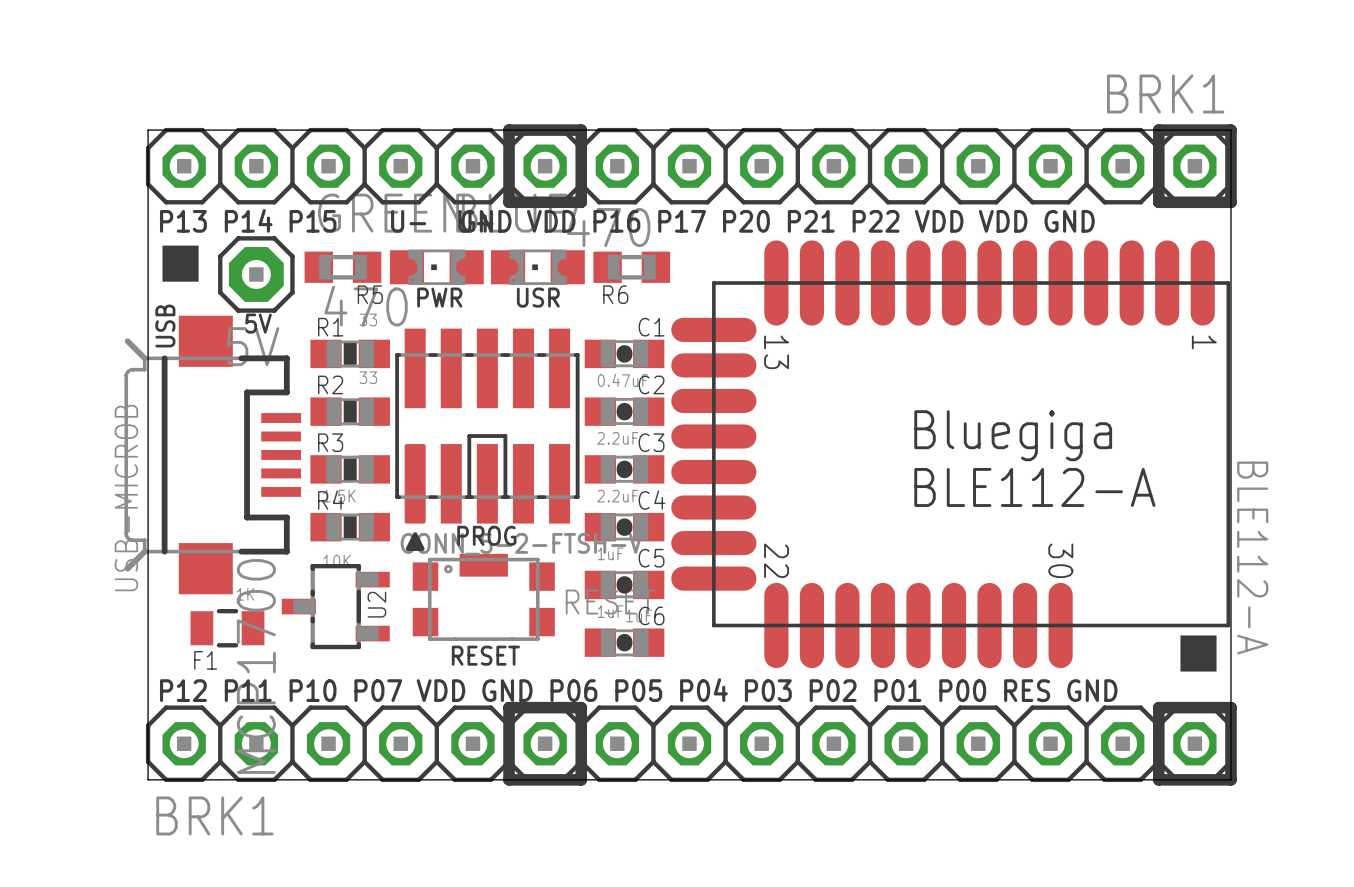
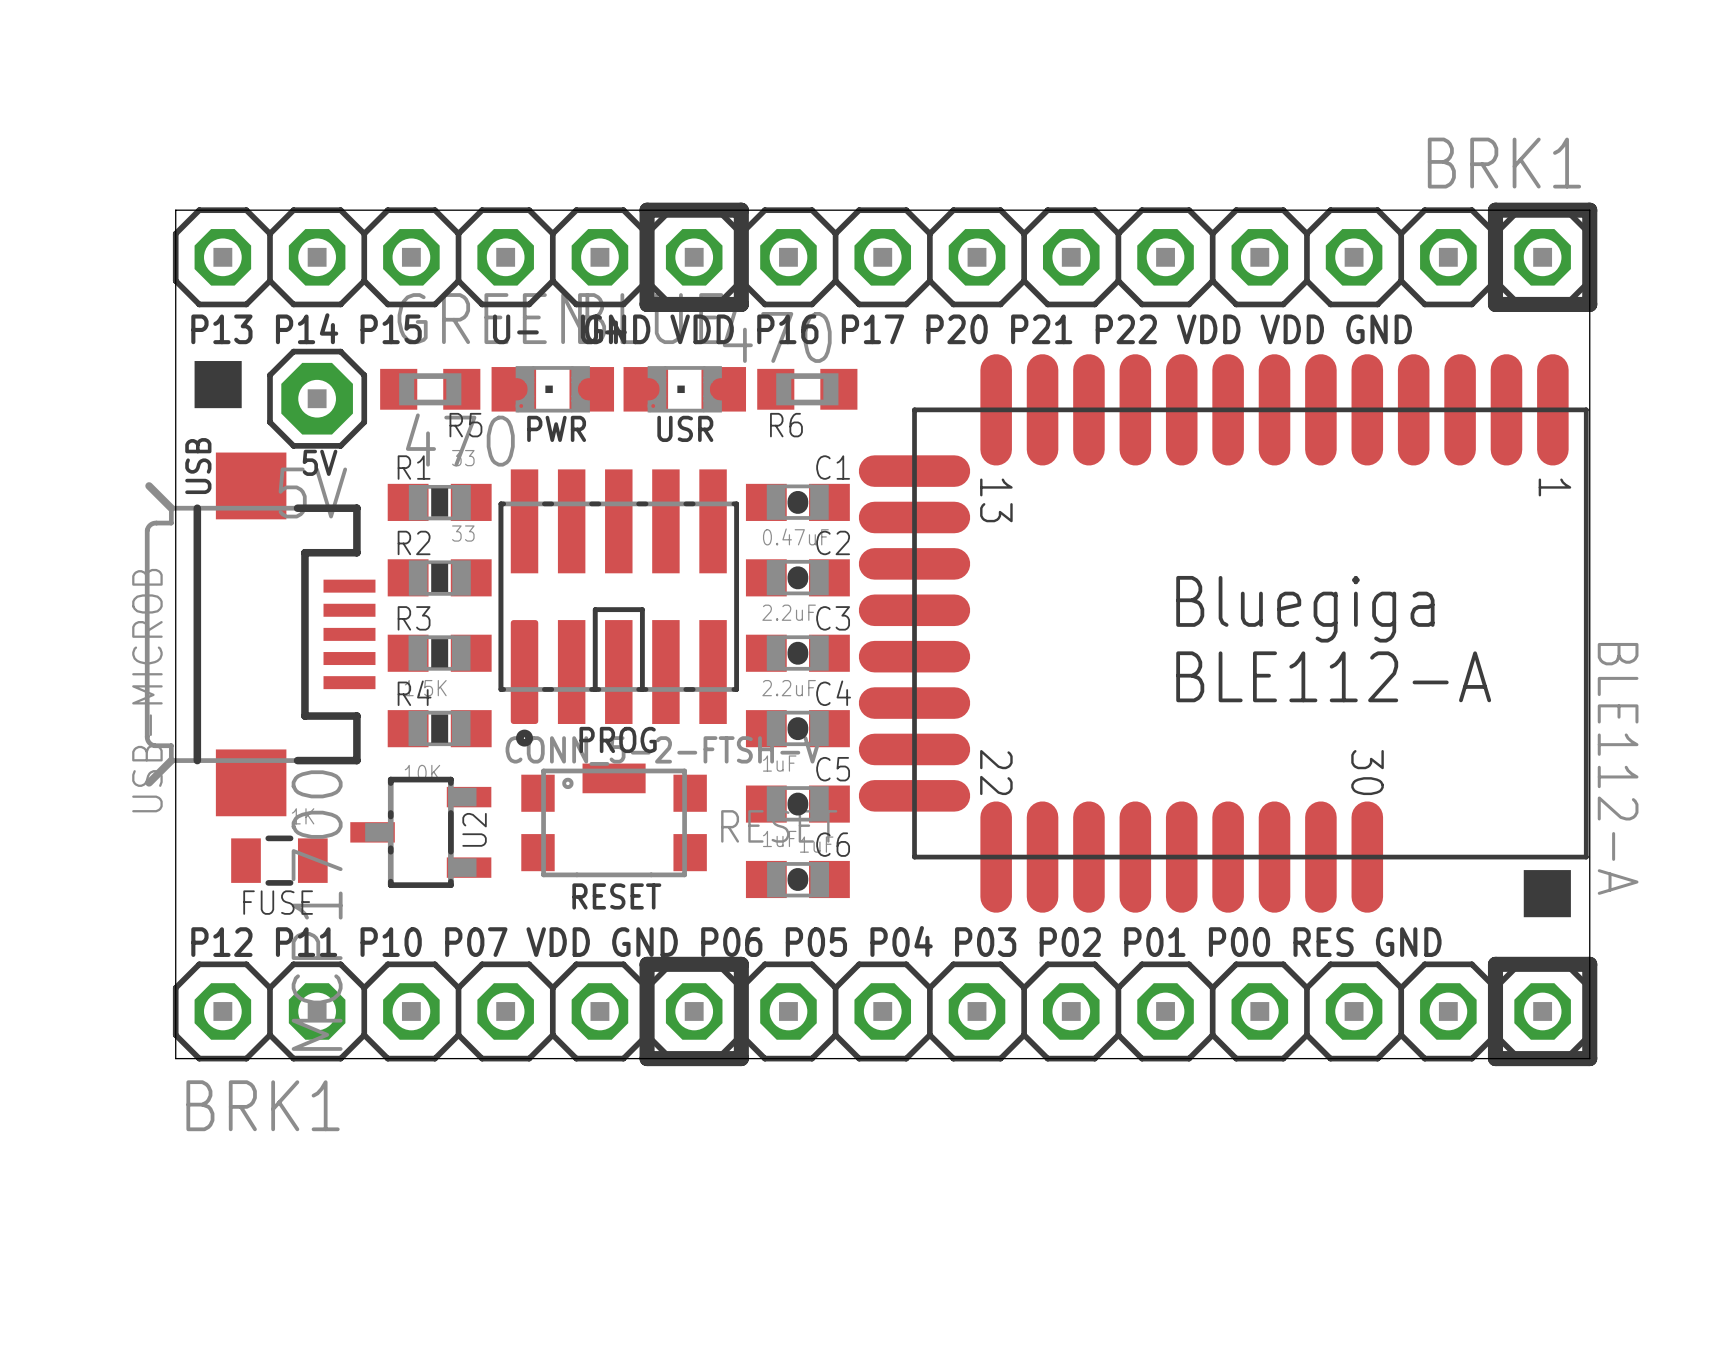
drawing shape: [405, 532, 425, 551] -> [516, 729, 534, 747]
F1 name: F1 (205, 660) -> FUSE (278, 902)

